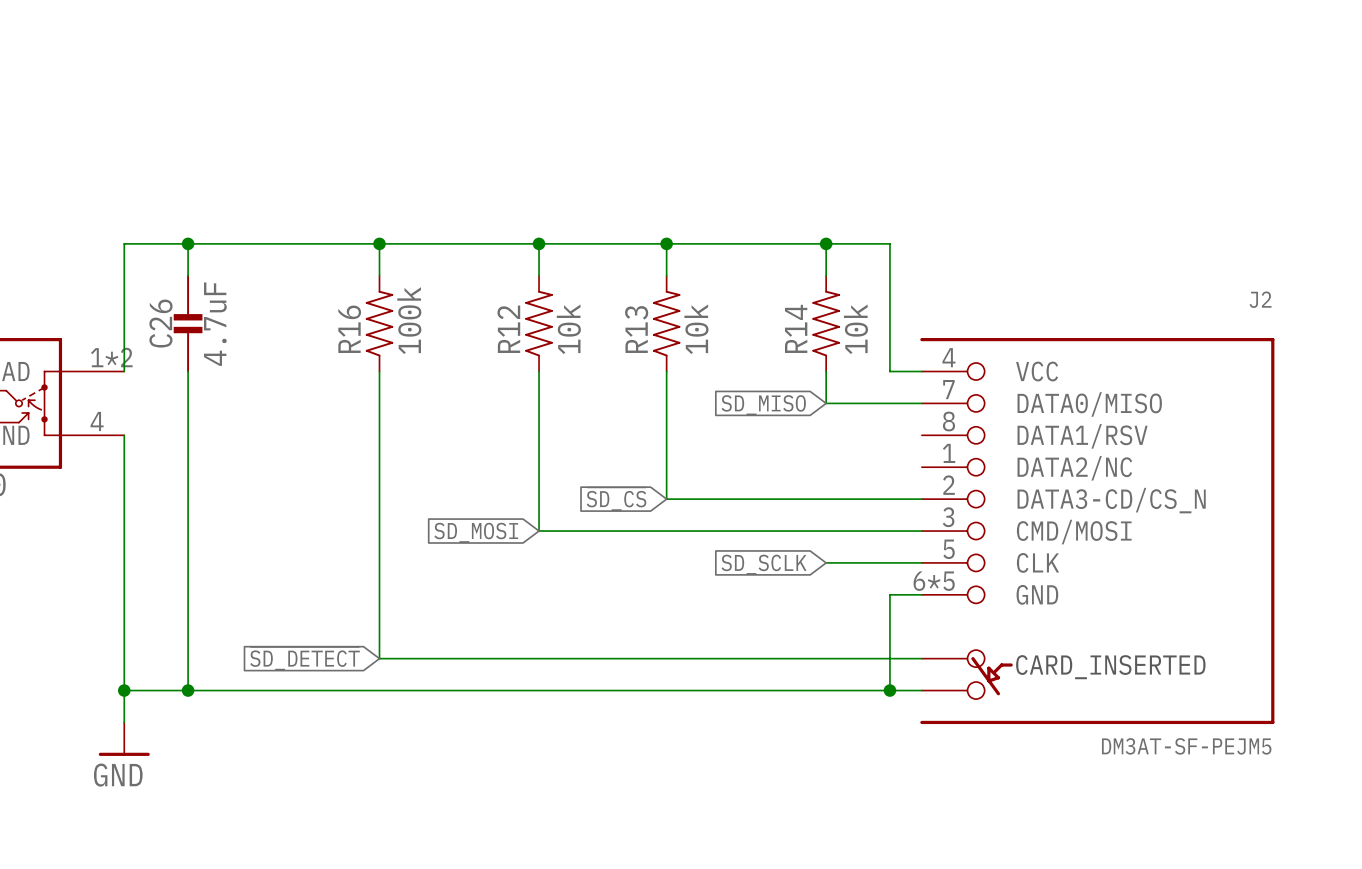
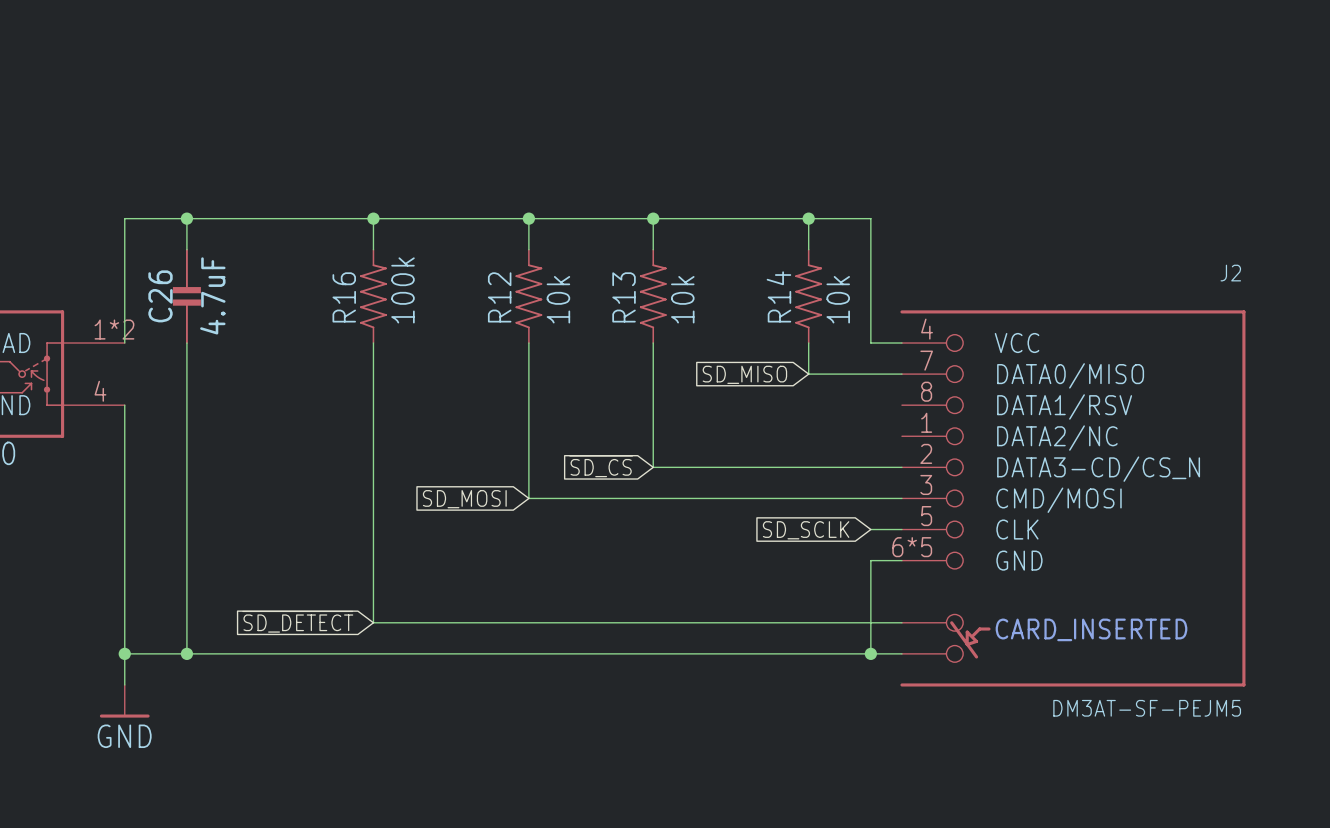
wire: (826, 562) (889, 562) -> none
global label position: SD_SCLK (764, 564) -> SD_SCLK (806, 530)

